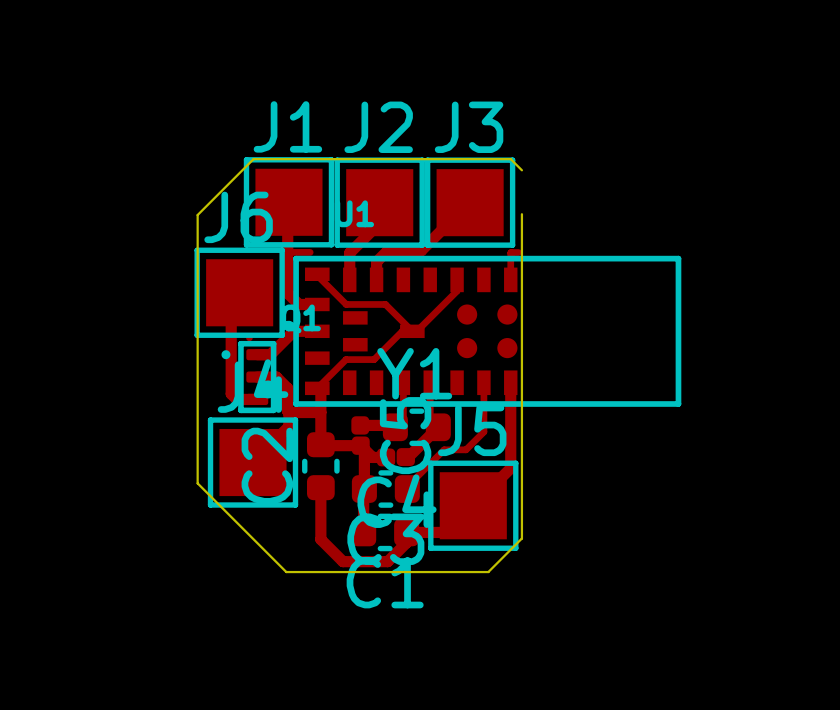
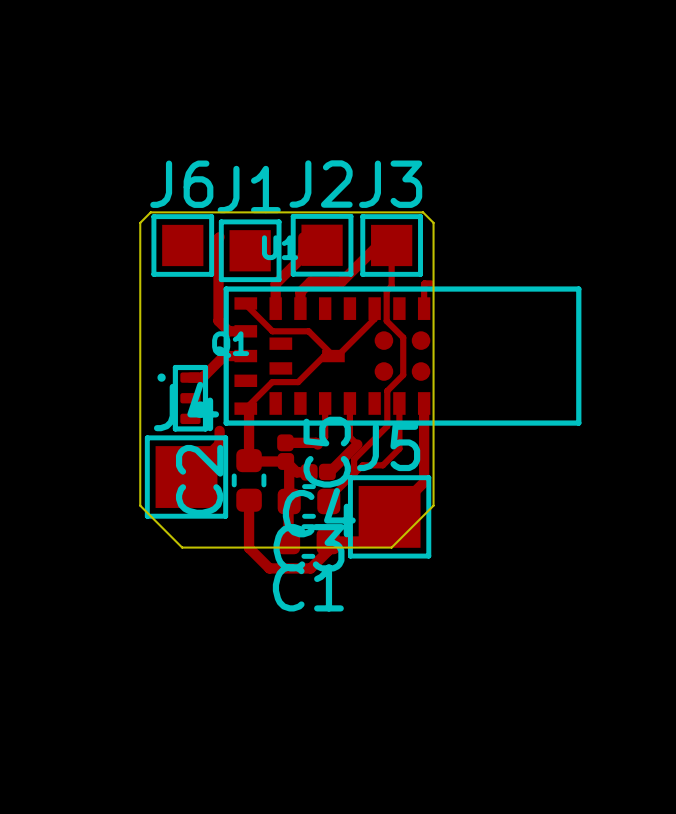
J2 name position: J2 (378, 127) -> J2 (321, 184)
J3 name position: J3 (469, 127) -> J3 (390, 184)
J1 footprint: [243, 157, 335, 248] -> [218, 219, 282, 283]
J2 footprint: [334, 157, 425, 248] -> [290, 213, 354, 277]
J3 footprint: [424, 157, 516, 248] -> [360, 214, 423, 277]
board edge: (521, 170) (510, 159) (253, 159) (197, 215) (197, 483) (286, 572) (488, 572) (521, 538) (521, 214) -> none
board edge: none -> (150, 212) (140, 222) (140, 505) (182, 547) (391, 547) (433, 505) (433, 222) (423, 212) (150, 212)
top track: none -> (391, 243) (391, 286) (386, 291) (386, 321) (403, 337) (403, 375) (387, 390) (387, 426) (354, 459) (354, 477)
J6 footprint: [194, 247, 285, 338] -> [151, 214, 215, 277]
top track: (287, 252) (310, 252) -> none
top track: (239, 292) (231, 301) (231, 393) (236, 399) (257, 399) -> none
top track: (257, 377) (276, 377) (287, 388) (288, 412) (320, 412) -> none
Y1: (416, 427) -> none

